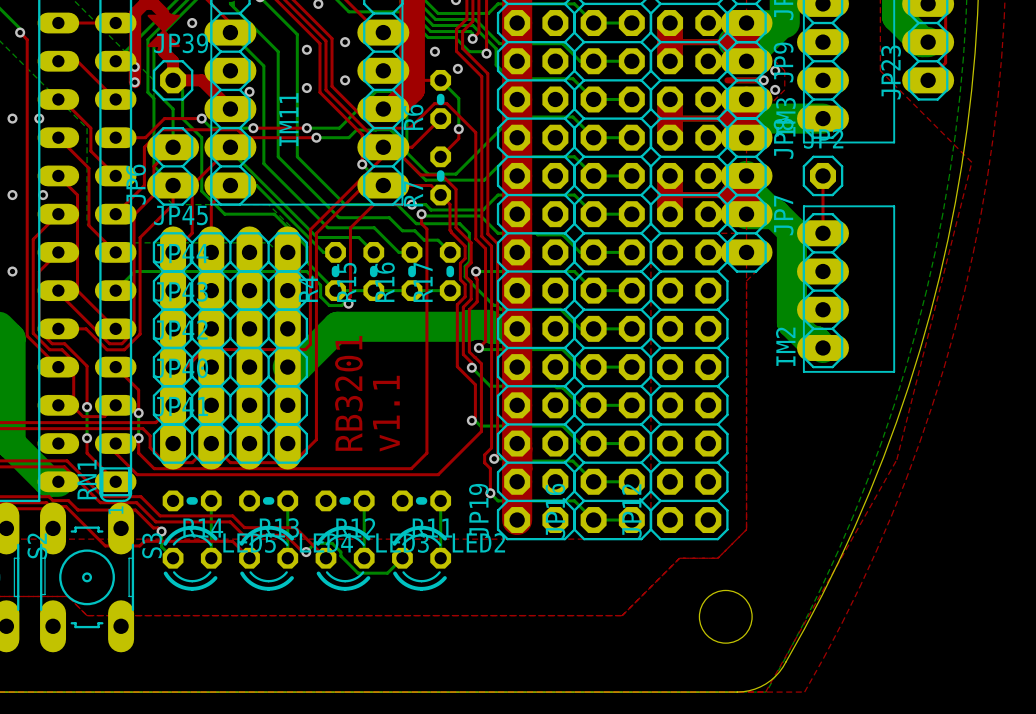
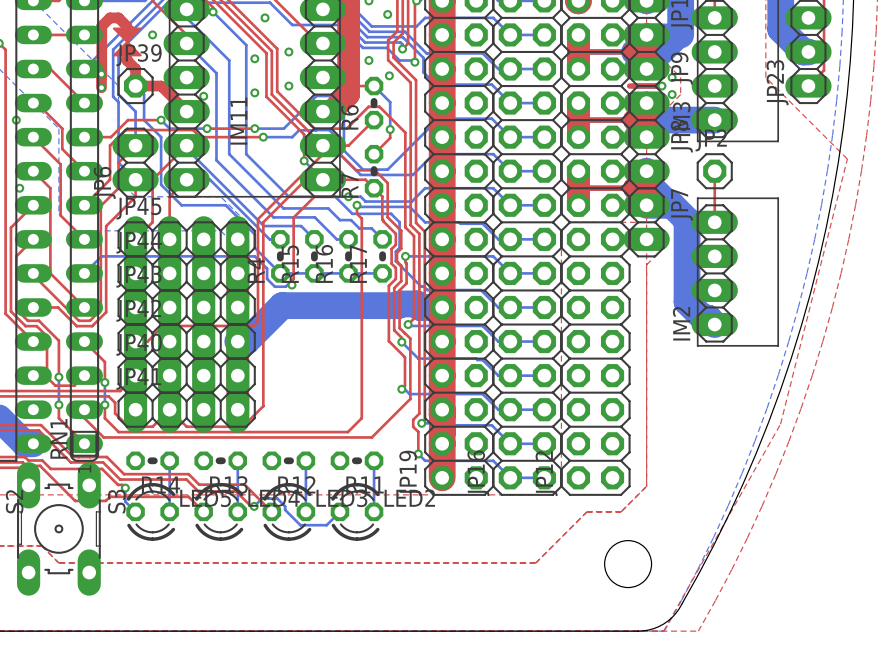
text: RB3201 (348, 393) -> none
text: v1.1 (386, 413) -> none

